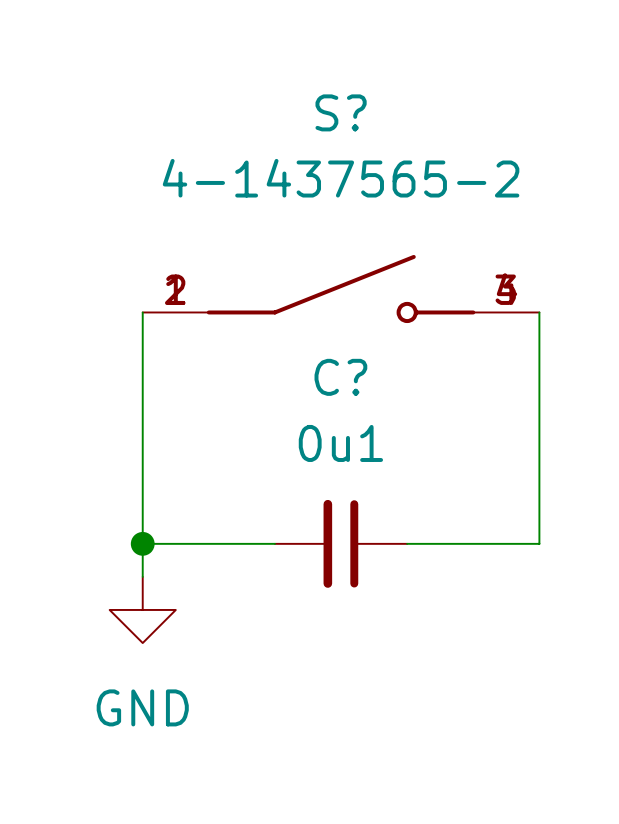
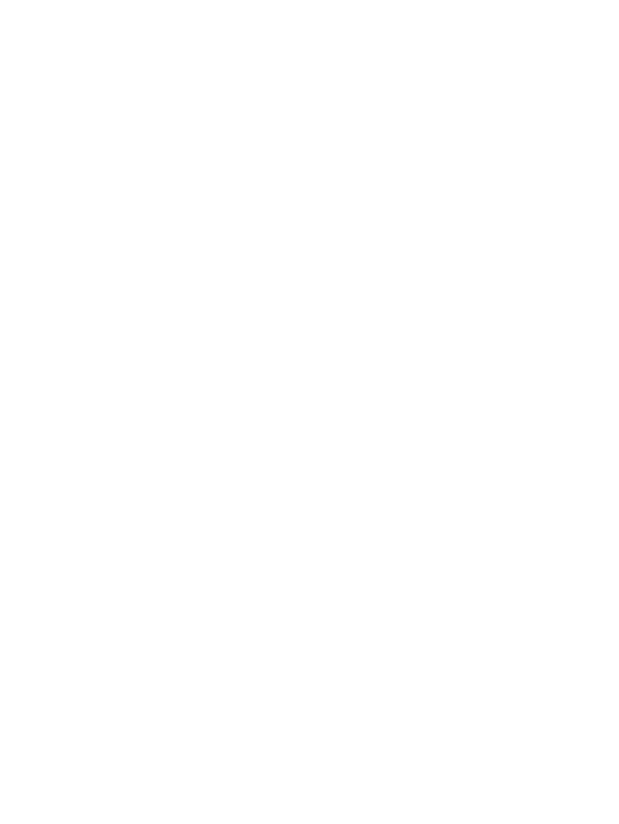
S?: 4-1437565-2 (341, 289) -> none
wire: (142, 312) (142, 576) -> none
wire: (539, 312) (539, 543) (407, 543) -> none
wire: (142, 543) (274, 543) -> none
junction: (142, 543) -> none
C?: 0u1 (341, 543) -> none
power symbol: GND (142, 609) -> none

